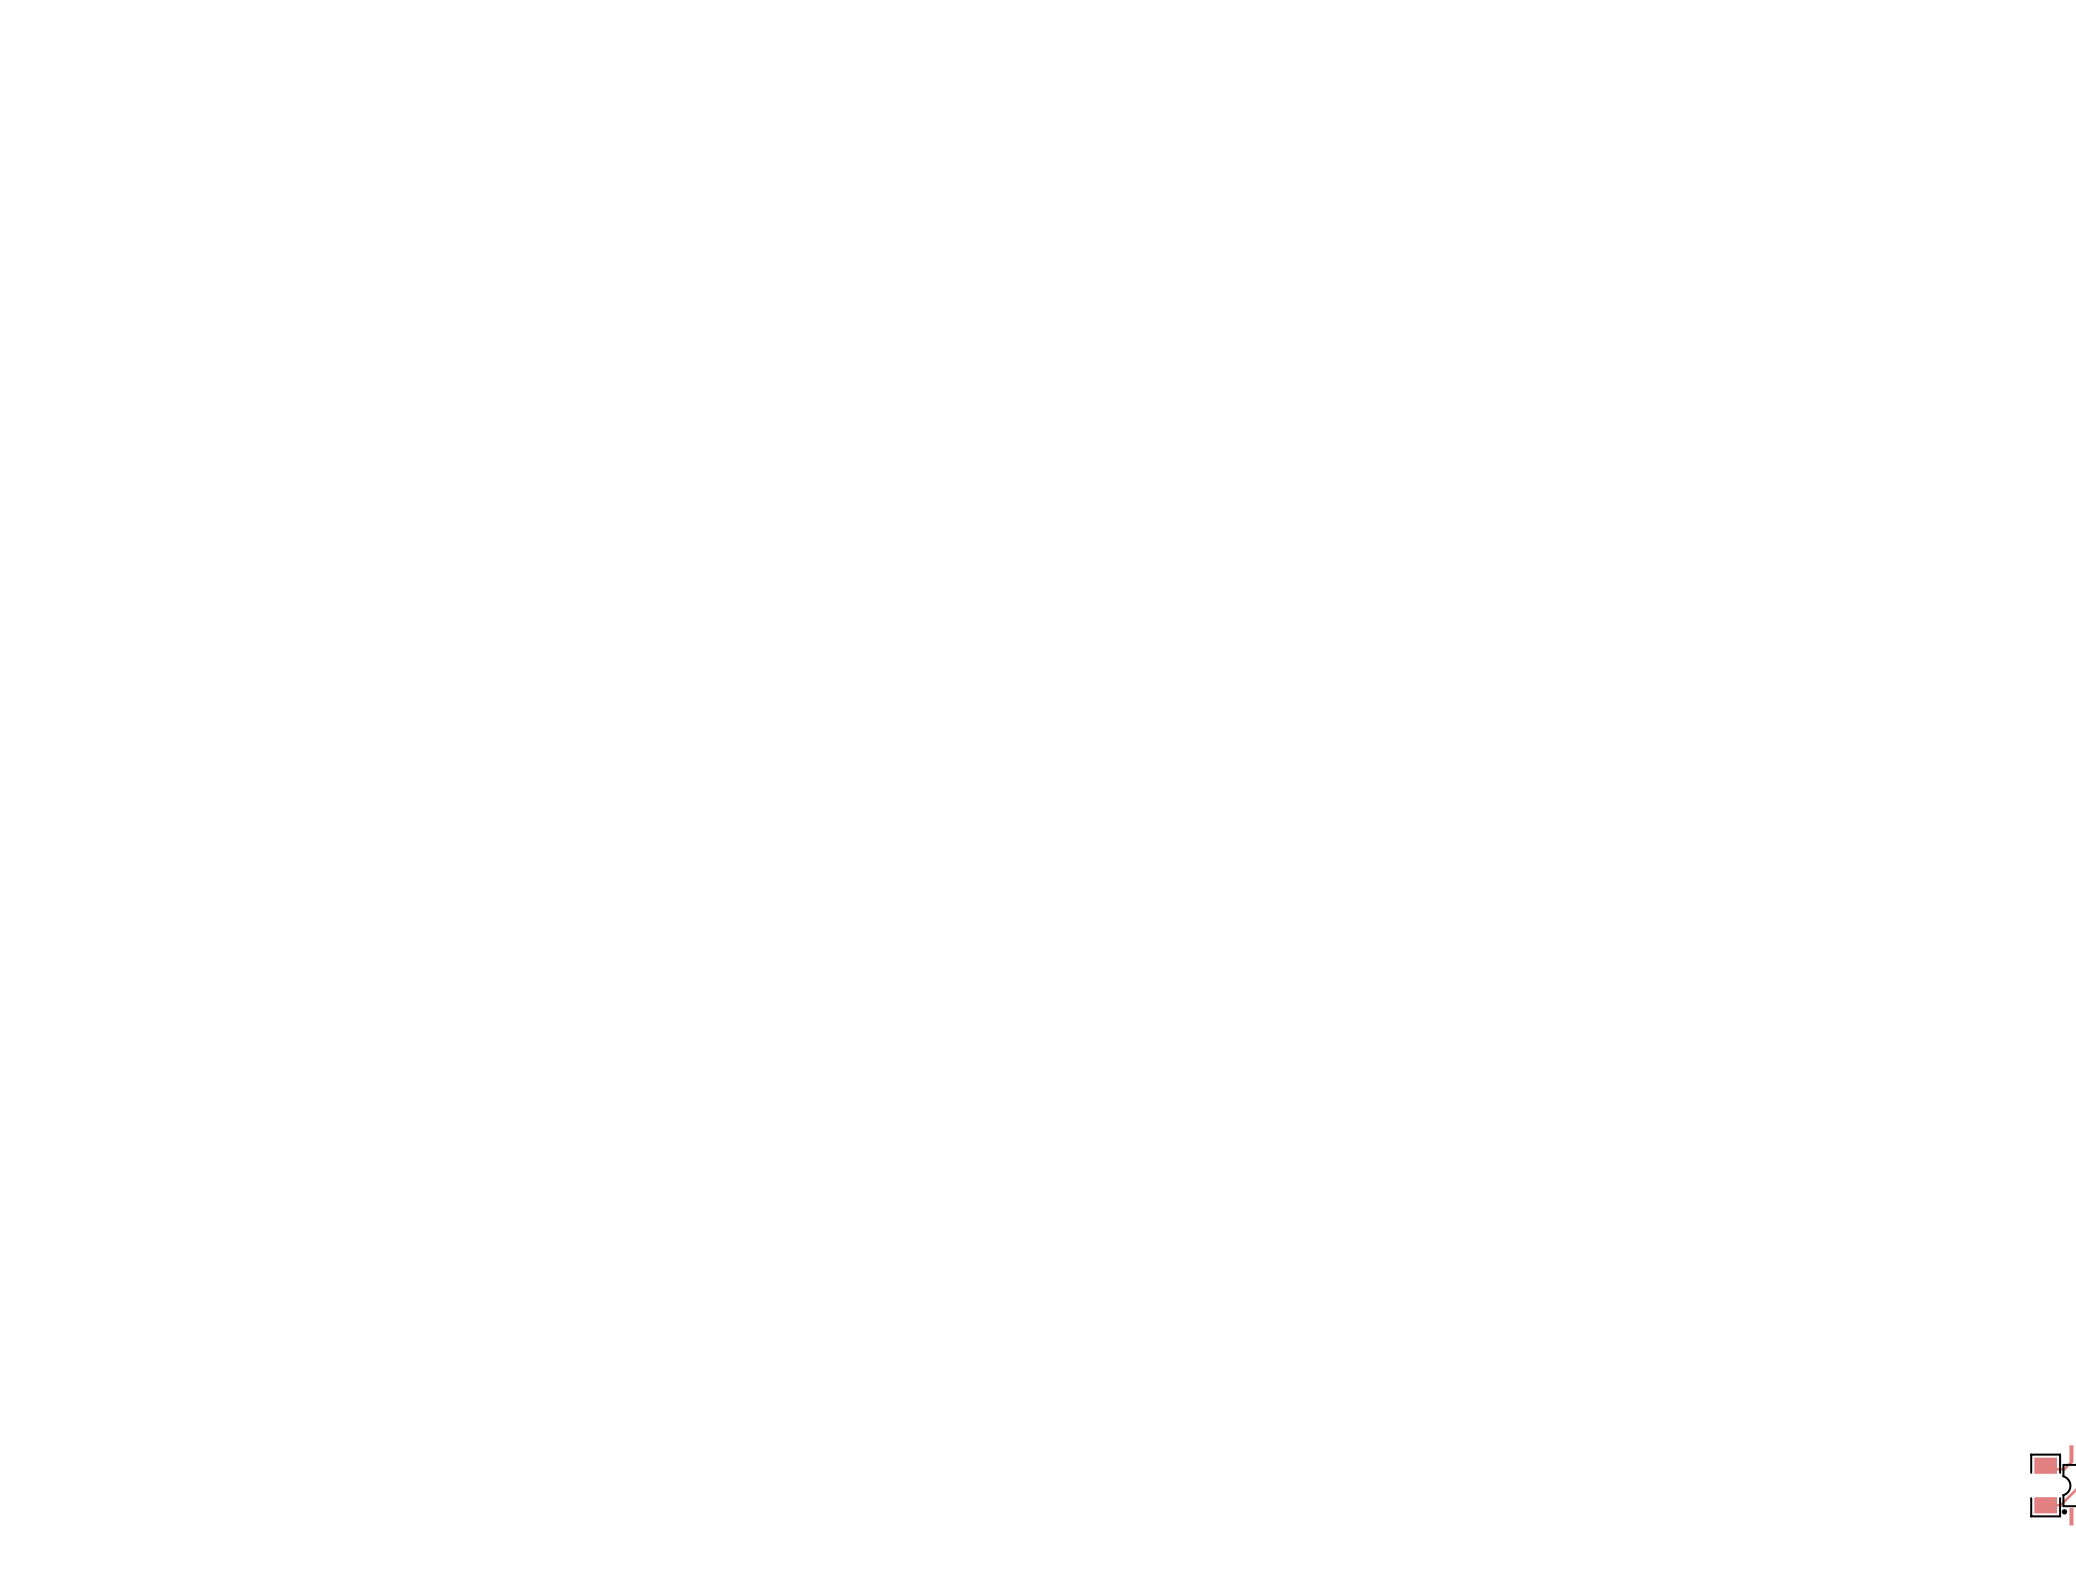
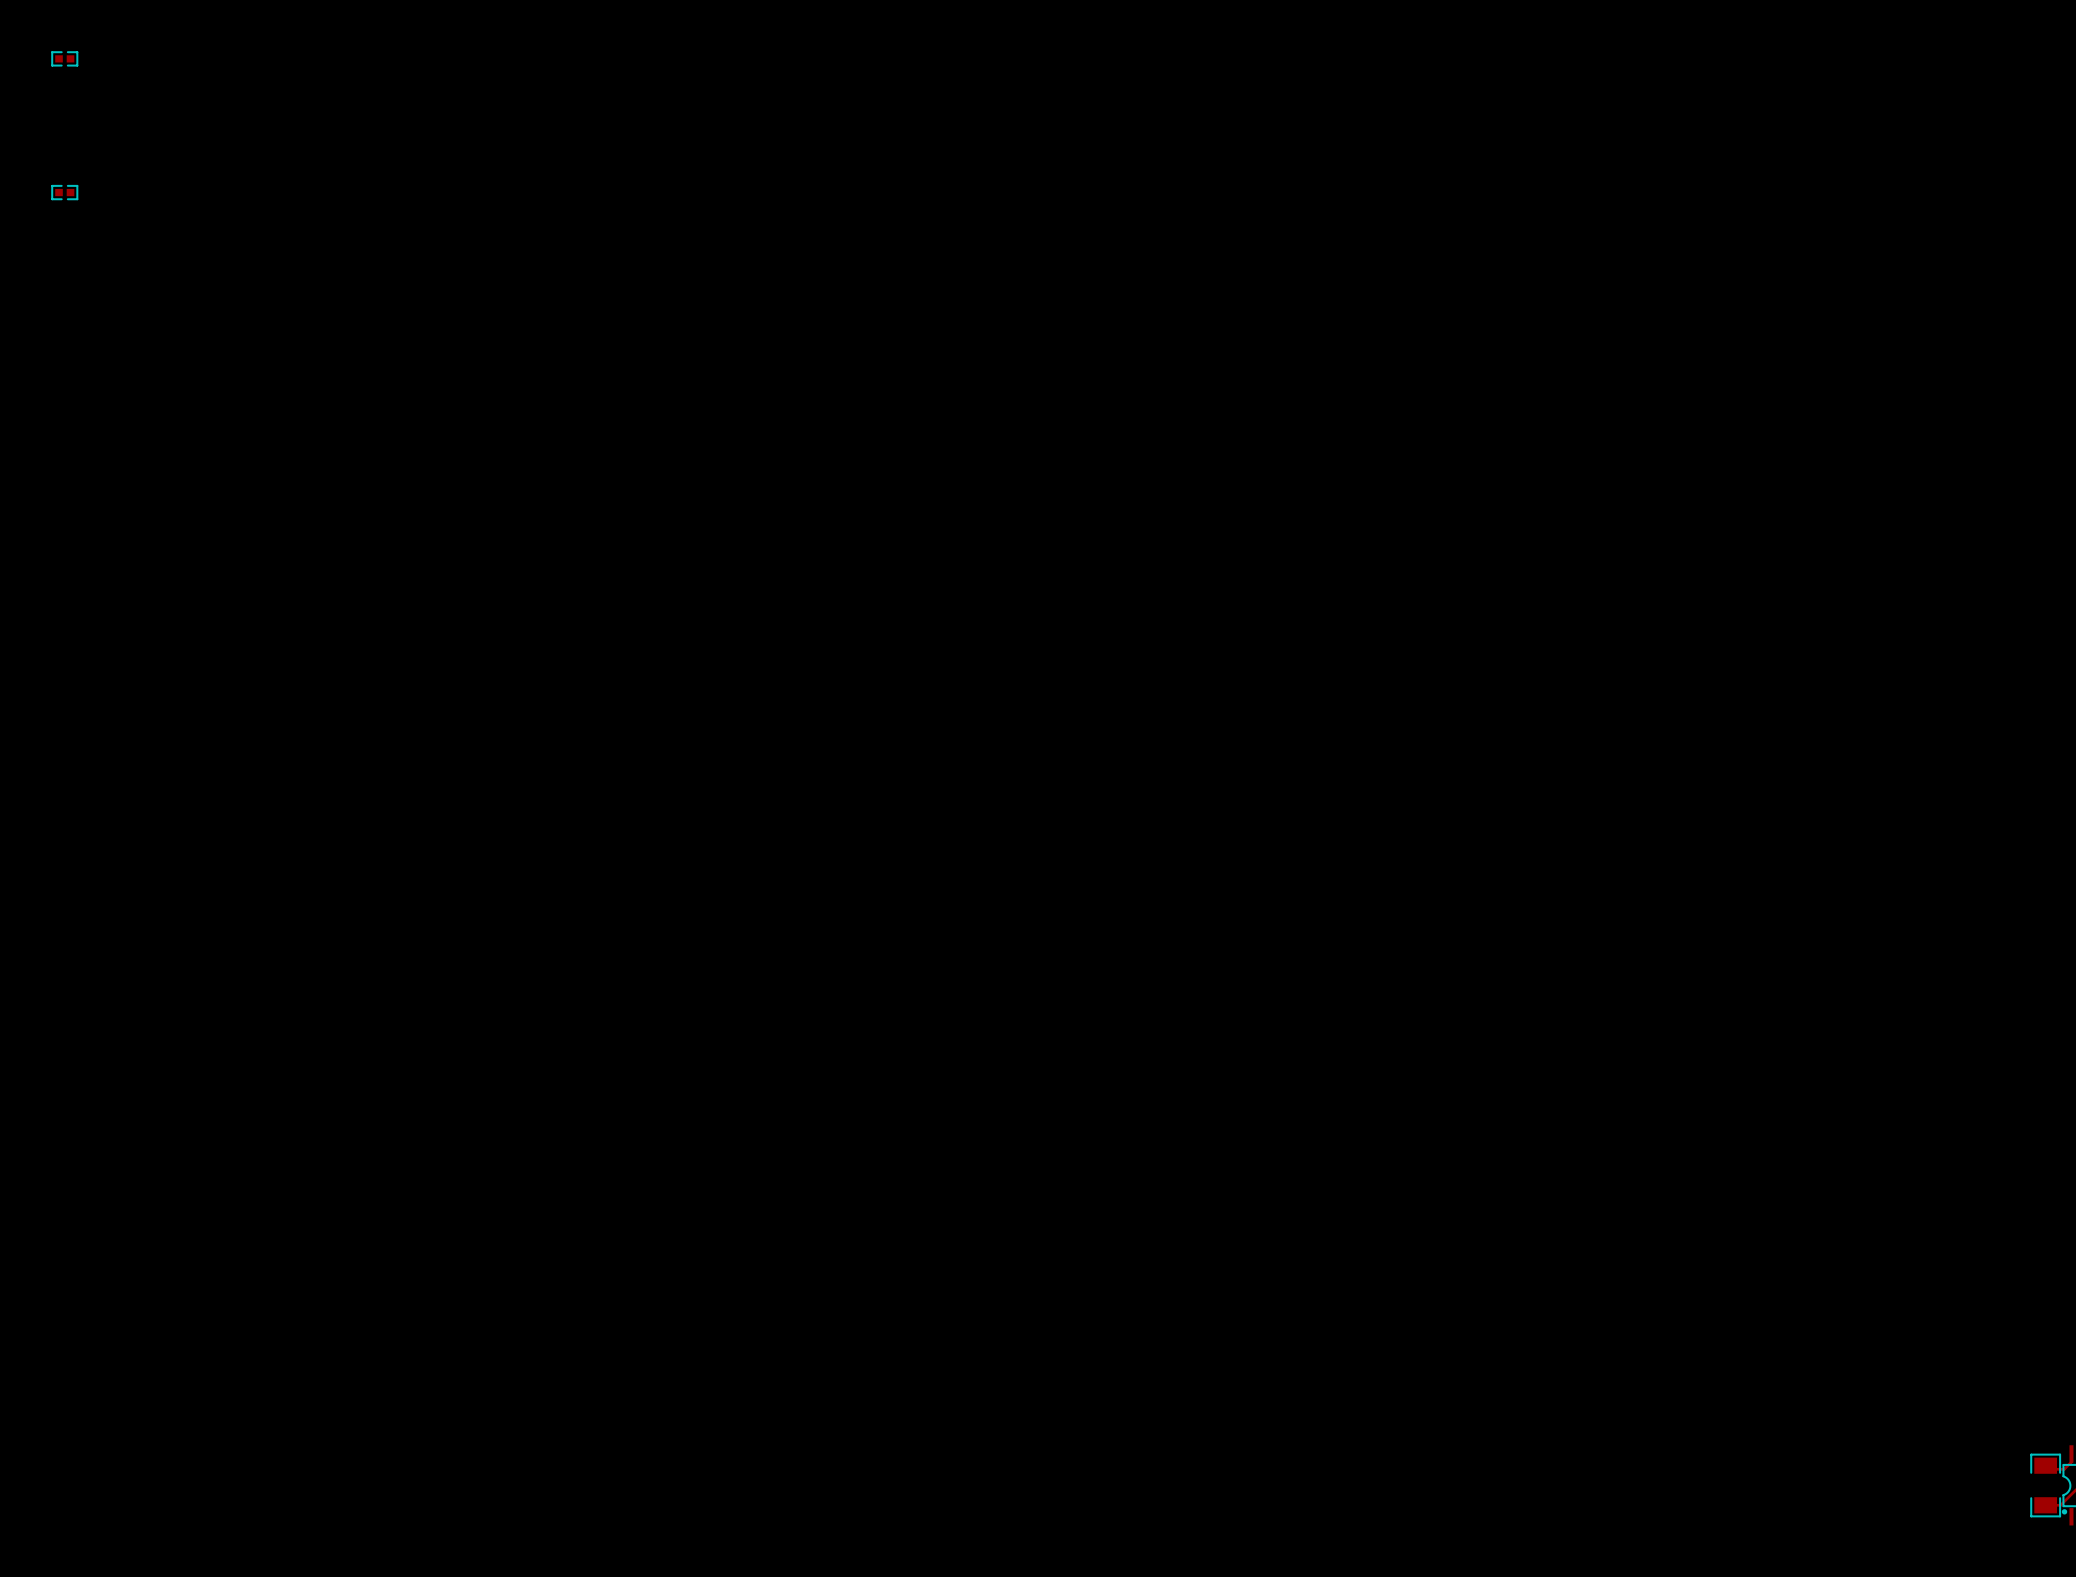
part: none -> (64, 58)
part: none -> (64, 192)

